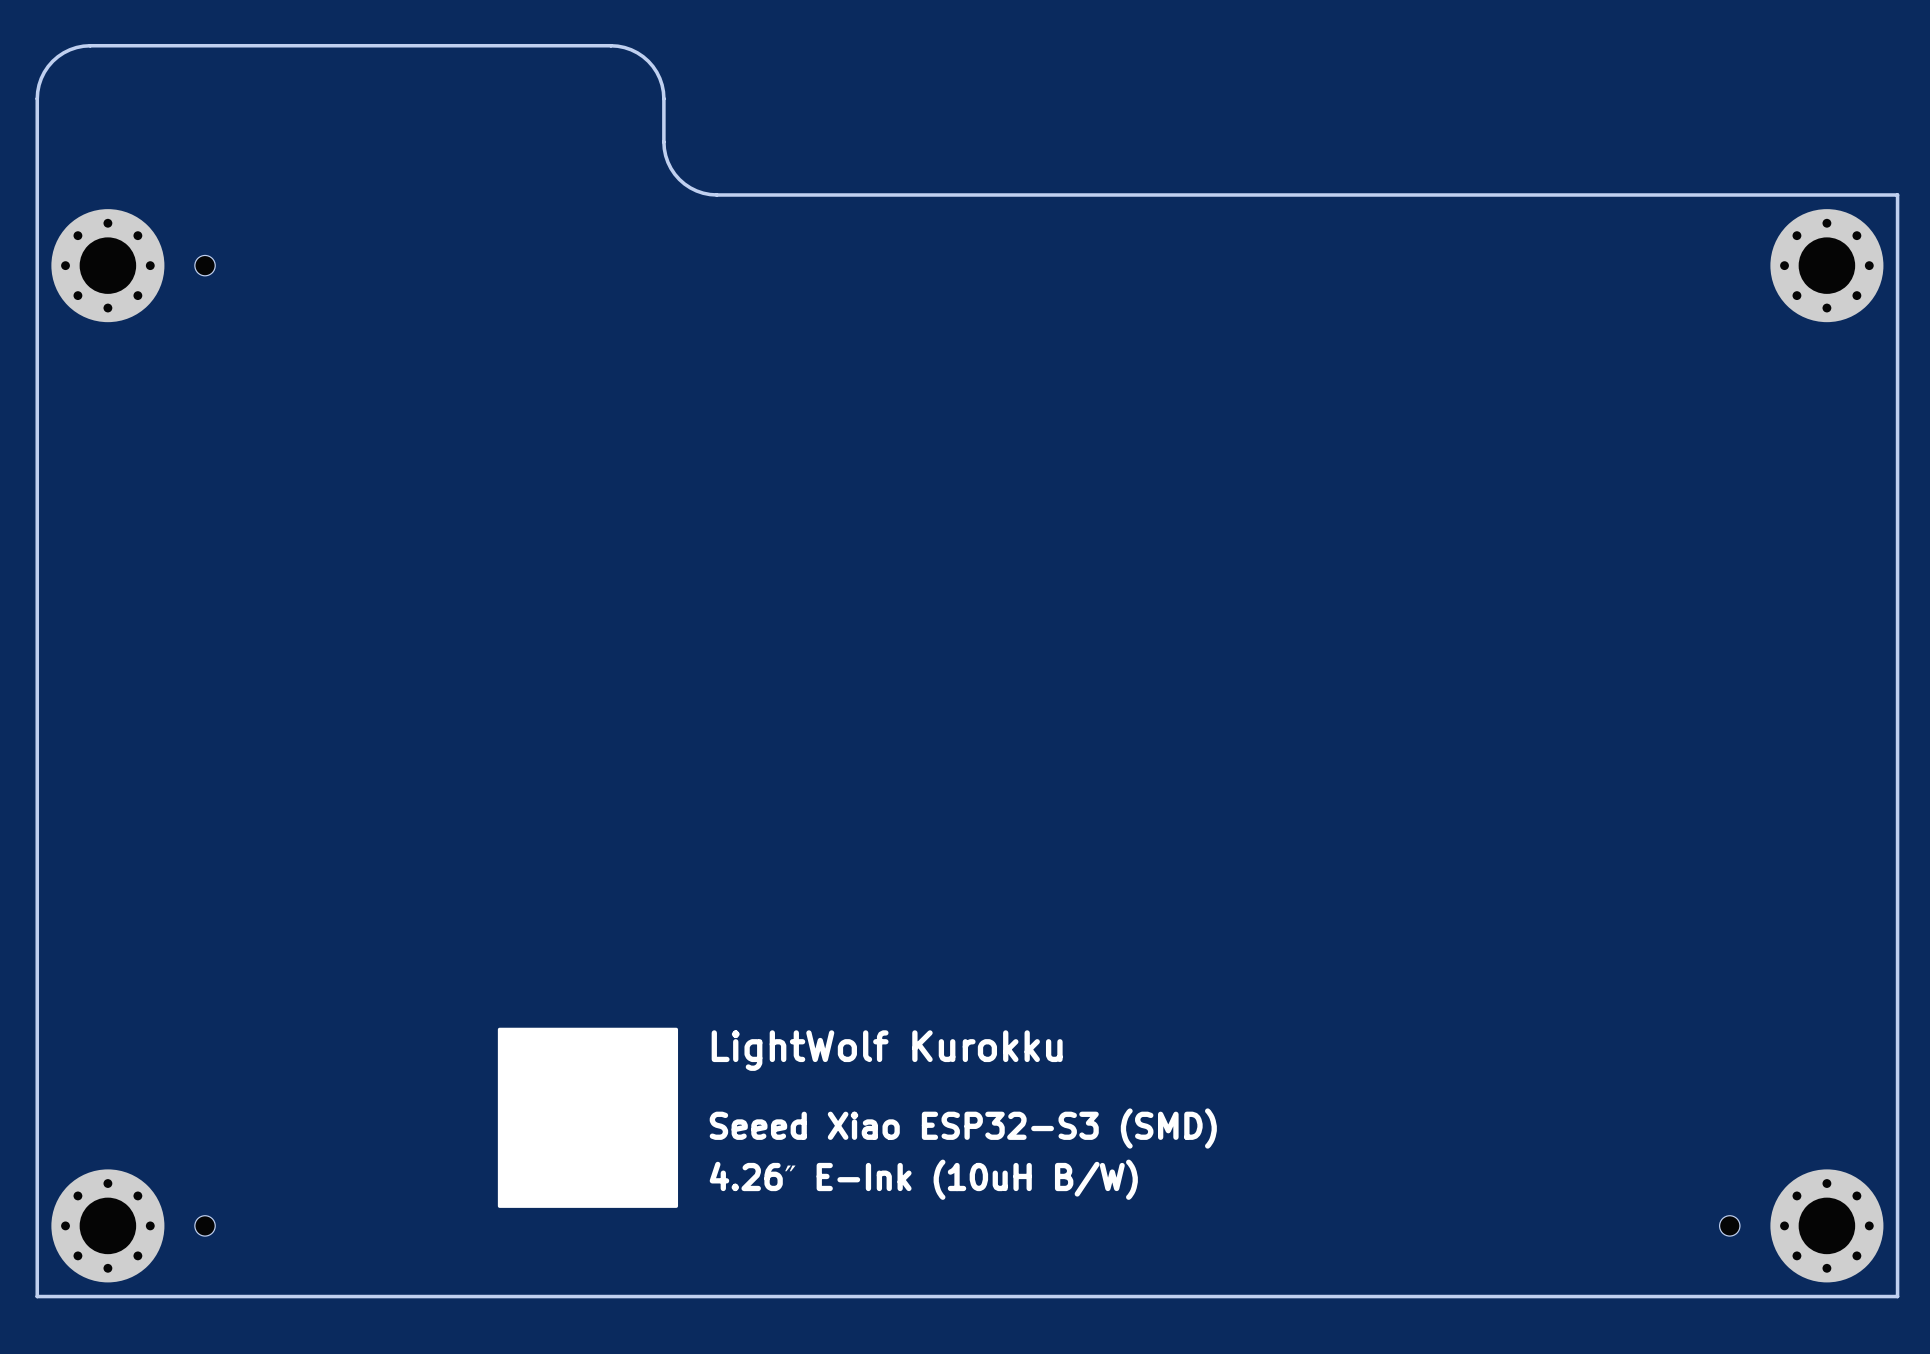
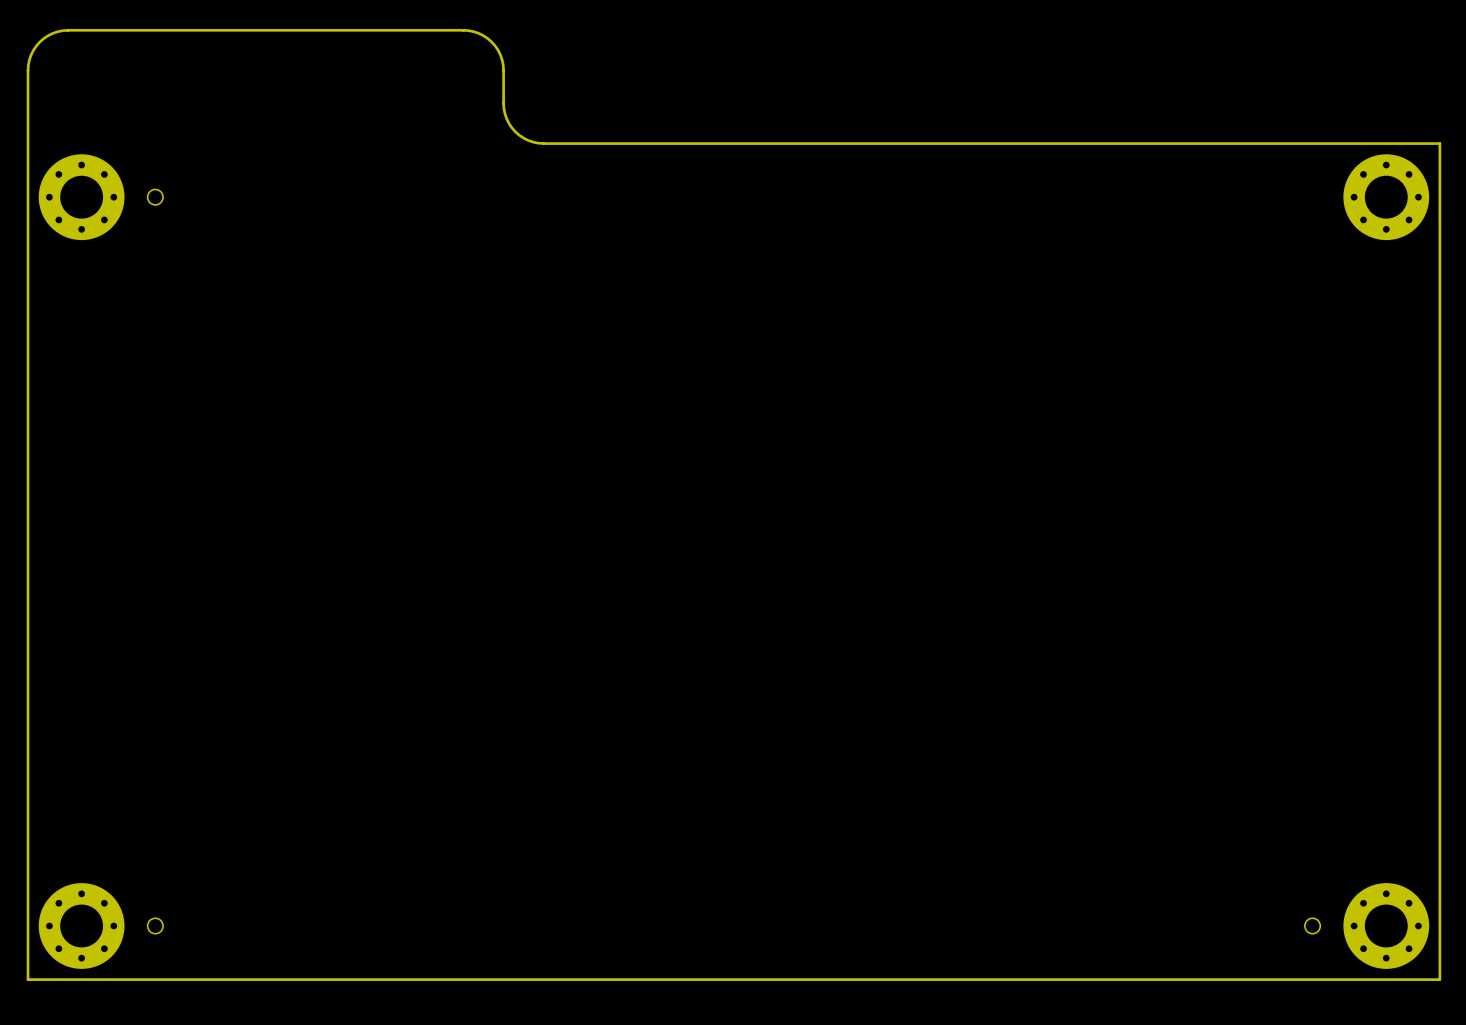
drawing: [497, 1027, 679, 1208] -> none
text: LightWolf Kurokku (887, 1050) -> none
text: Seeed Xiao ESP32-S3 (SMD) (963, 1128) -> none
text: 4.26″ E-Ink (10uH B/W) (923, 1179) -> none

